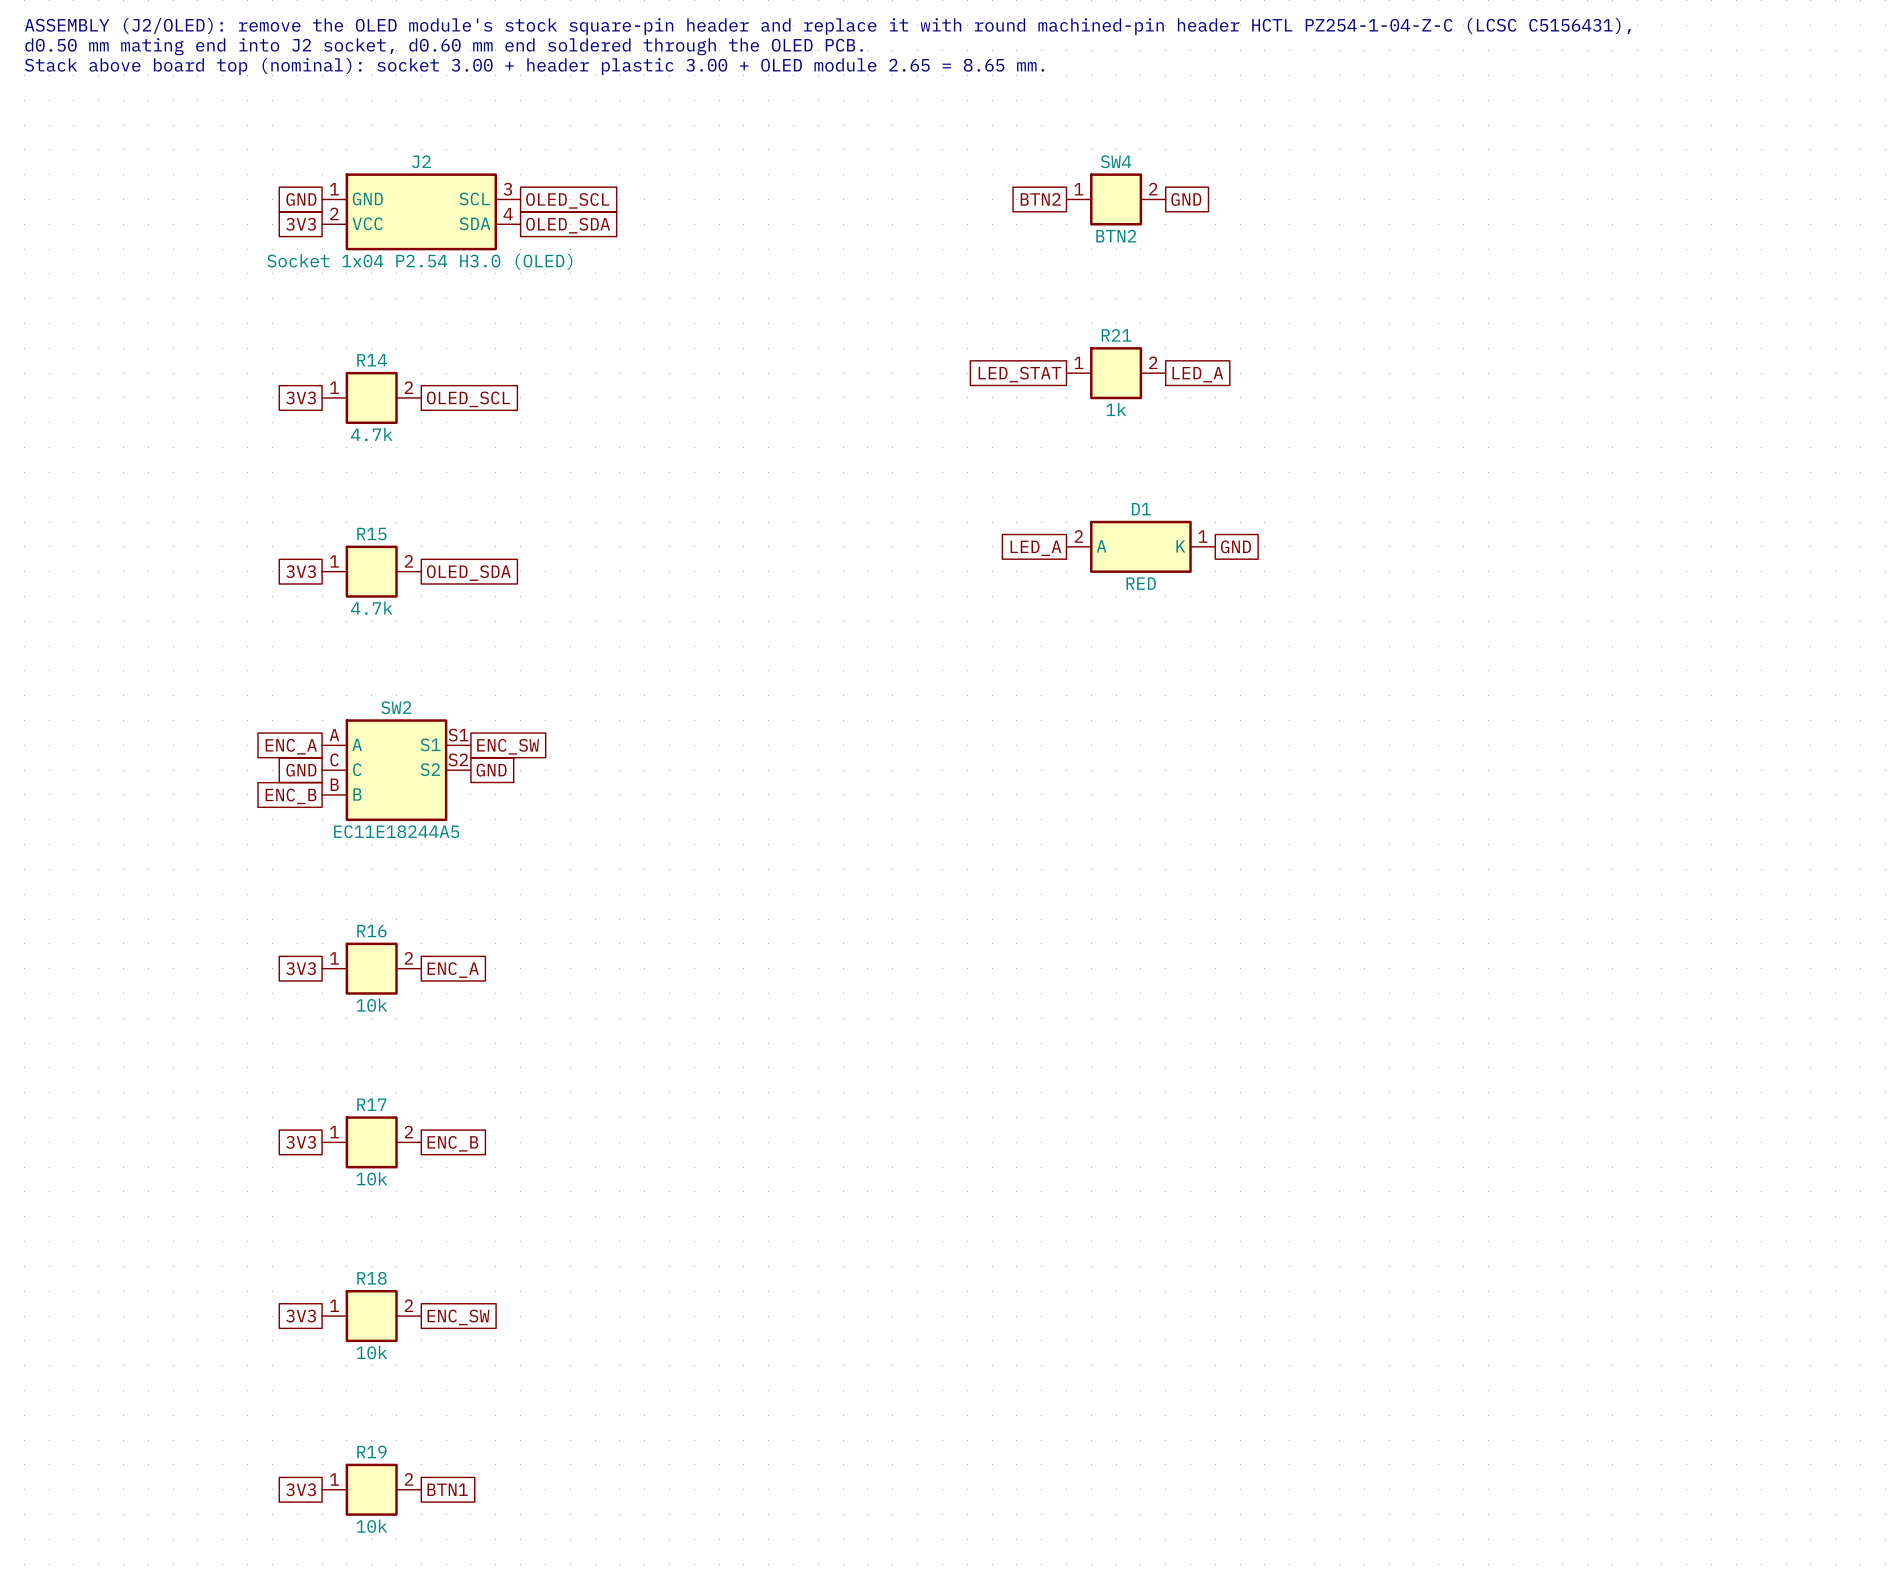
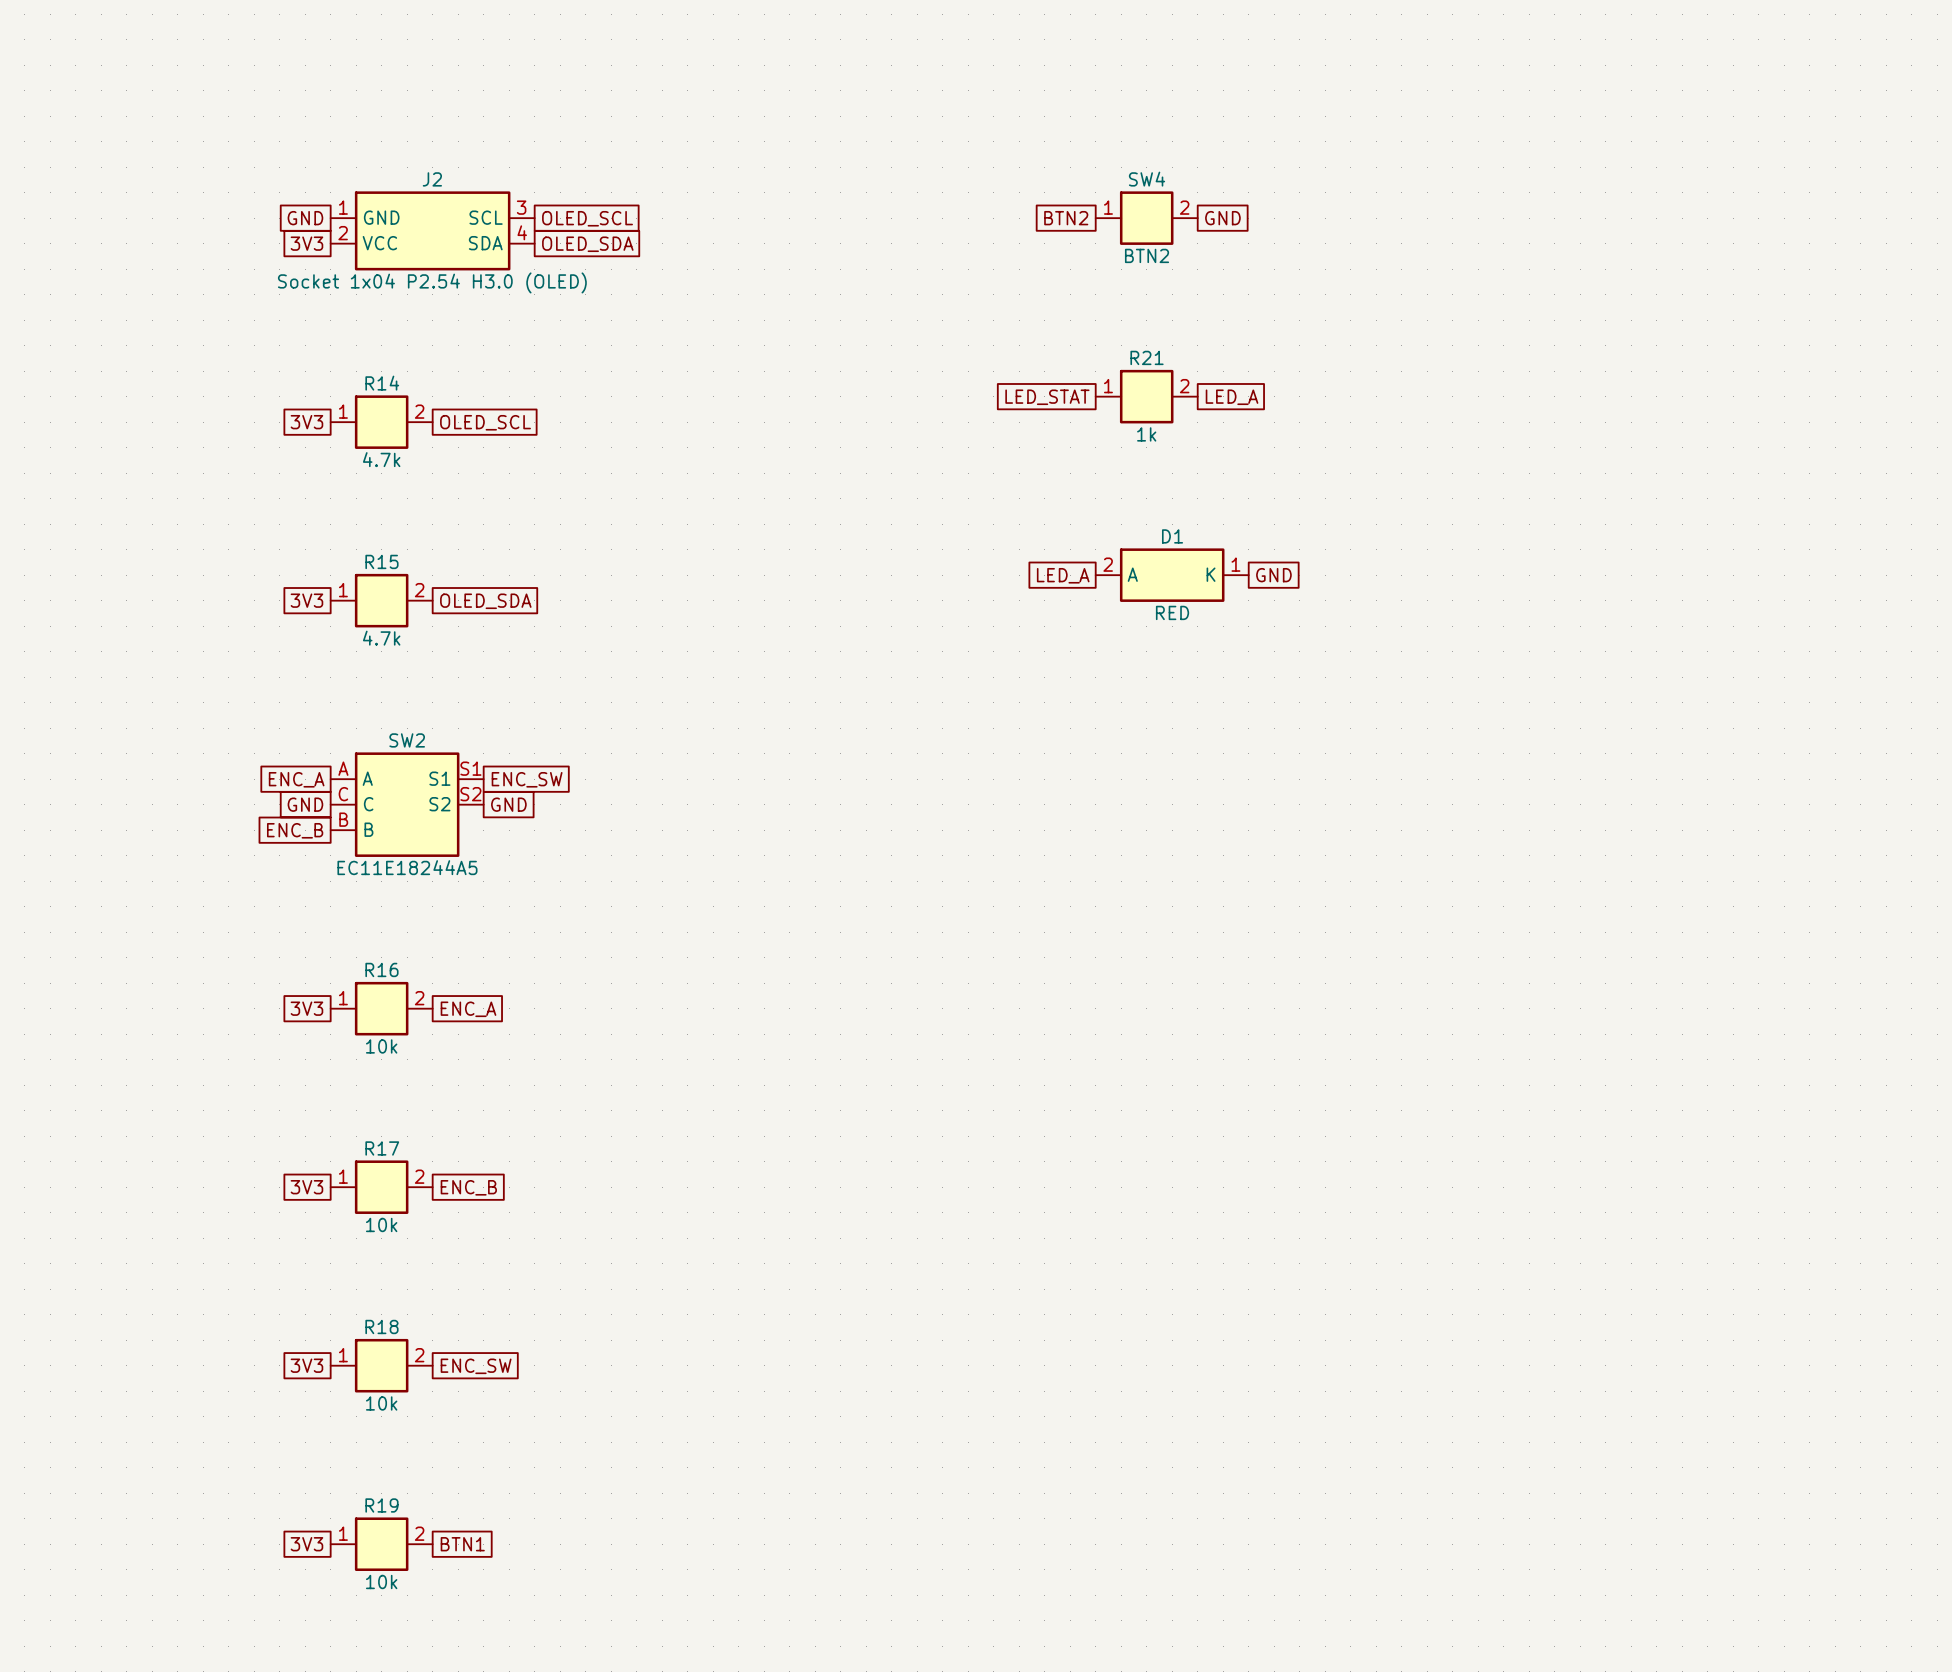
text: ASSEMBLY (J2/OLED): remove the OLED module's stock square-pin header and replace it with round machined-pin header HCTL PZ254-1-04-Z-C (LCSC C5156431), (827, 26) -> none
text: d0.50 mm mating end into J2 socket, d0.60 mm end soldered through the OLED PCB. (444, 46) -> none
text: Stack above board top (nominal): socket 3.00 + header plastic 3.00 + OLED module 2.65 = 8.65 mm. (534, 66) -> none

